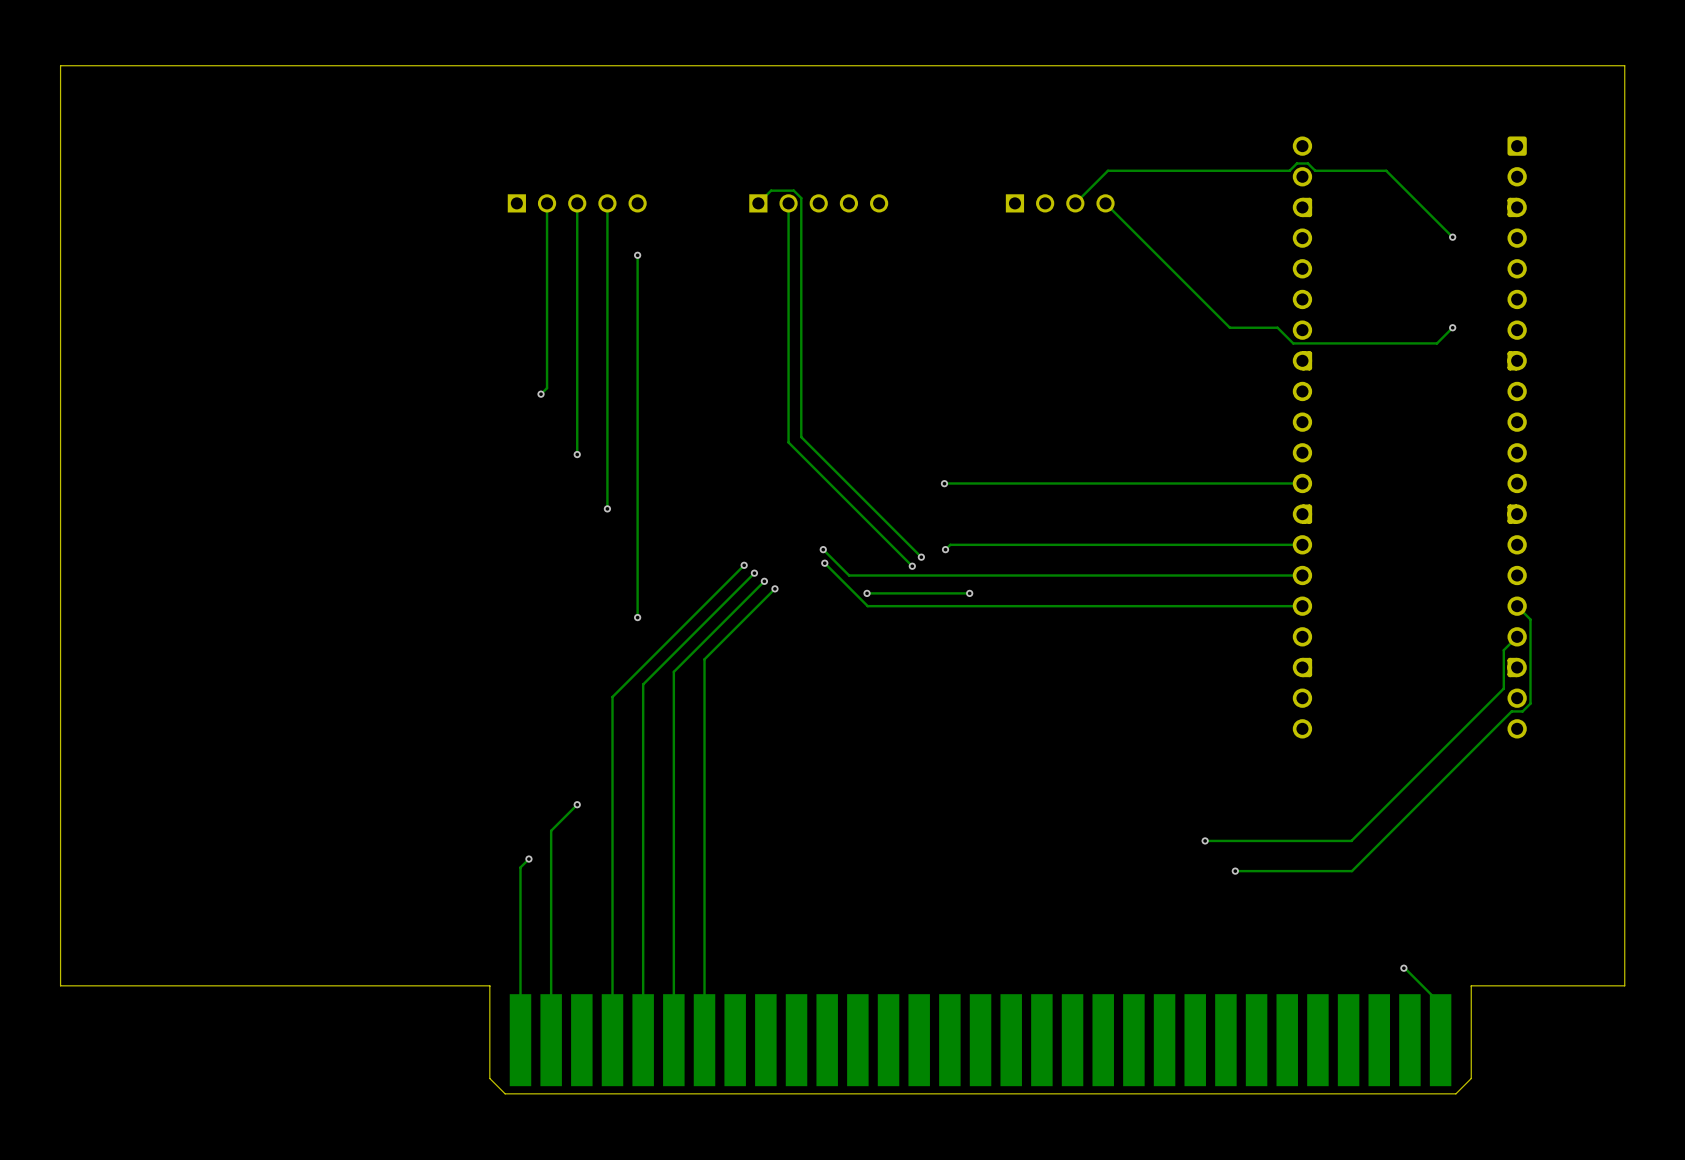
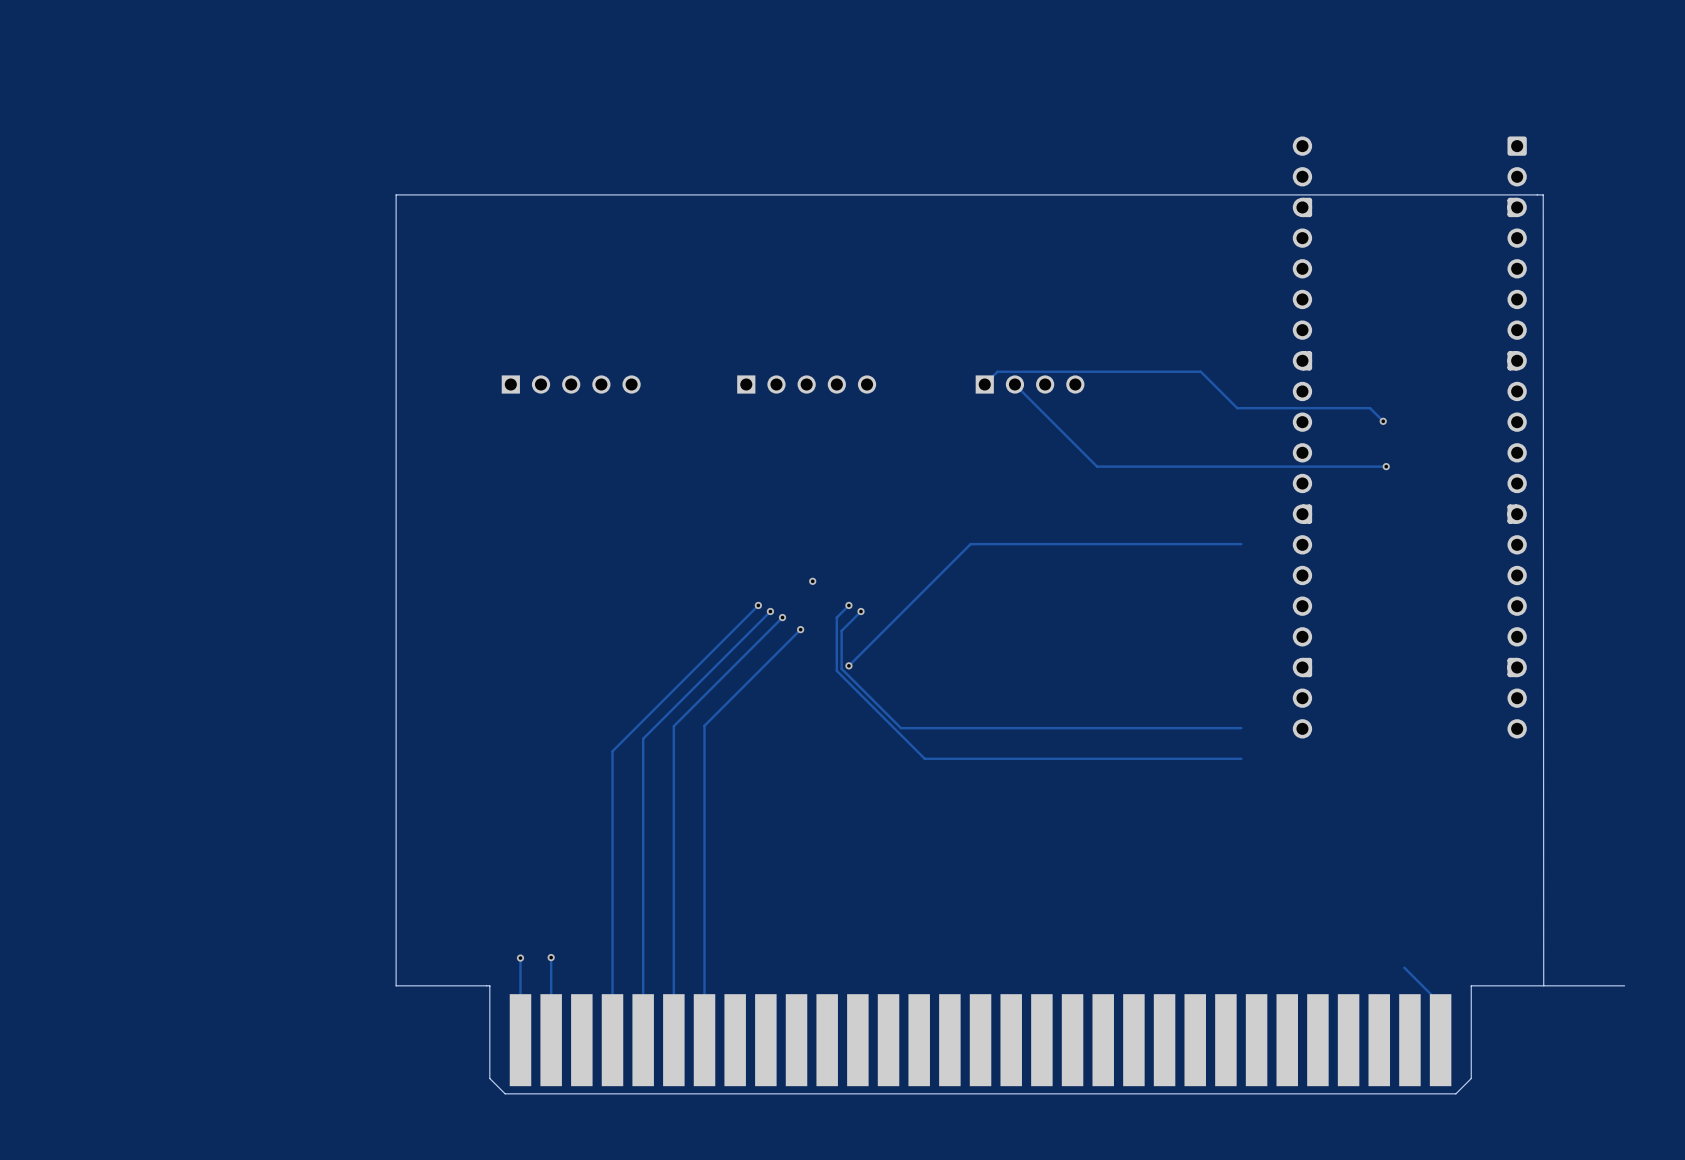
track: (547, 203) (547, 388) (541, 394) -> none
track: (577, 203) (577, 454) -> none
part: (577, 203) -> none
track: (607, 203) (607, 508) -> none
track: (758, 203) (771, 190) (793, 190) (801, 198) (801, 437) (921, 557) -> none
track: (788, 203) (788, 442) (912, 566) -> none
part: (818, 203) -> none
part position: (1060, 203) -> (1030, 384)
track: (1075, 203) (1107, 170) (1289, 170) (1296, 163) (1307, 163) (1315, 170) (1386, 170) (1452, 237) -> none
track: (1105, 203) (1229, 327) (1277, 327) (1293, 343) (1437, 343) (1452, 327) -> none
via: (1452, 237) -> none
track: (637, 255) (637, 617) -> none
via: (637, 255) -> none
via: (1452, 327) -> none
part: none -> (571, 384)
part: none -> (806, 384)
track: none -> (984, 384) (997, 371) (1200, 371) (1237, 408) (1370, 408) (1383, 421)
track: none -> (1014, 384) (1097, 466) (1386, 466)
via: (541, 394) -> none
via: none -> (1383, 421)
via: (577, 454) -> none
via: none -> (1386, 466)
via: (944, 483) -> none
track: (1302, 483) (944, 483) -> none
via: (607, 508) -> none
track: none -> (1241, 544) (970, 544) (848, 665)
track: (1302, 544) (950, 544) (945, 549) -> none
track: (823, 549) (849, 575) (1302, 575) -> none
via: (823, 549) -> none
via: (945, 549) -> none
via: (921, 557) -> none
track: (824, 563) (867, 606) (1302, 606) -> none
via: (824, 563) -> none
track: (744, 565) (612, 697) (612, 751) -> none
via: (744, 565) -> none
via: (912, 566) -> none
track: (754, 573) (643, 684) (643, 738) -> (770, 611) (643, 738)
via: (754, 573) -> none
track: (764, 581) (673, 671) (673, 726) -> (782, 617) (673, 726)
via: (764, 581) -> none
via: none -> (812, 581)
track: (774, 588) (758, 605) -> none
via: (774, 588) -> none
via: (867, 593) -> none
track: (969, 593) (867, 593) -> none
via: (969, 593) -> none
via: none -> (758, 605)
track: none -> (848, 605) (836, 617) (836, 670) (924, 758) (1241, 758)
via: none -> (848, 605)
track: (1517, 606) (1530, 619) (1530, 703) (1522, 711) (1511, 711) (1351, 871) (1235, 871) -> none
via: none -> (770, 611)
track: none -> (861, 611) (841, 630) (841, 668) (900, 728) (1241, 728)
via: none -> (861, 611)
via: (637, 617) -> none
via: none -> (782, 617)
track: none -> (800, 629) (704, 725)
via: none -> (800, 629)
track: (1517, 636) (1503, 650) (1503, 688) (1351, 840) (1205, 840) -> none
track: (704, 659) (704, 725) -> (704, 659) (612, 751)
via: none -> (848, 665)
track: (577, 804) (551, 830) (551, 957) -> none
via: (577, 804) -> none
via: (1205, 840) -> none
track: (528, 859) (520, 867) (520, 958) -> none
via: (528, 859) -> none
via: (1235, 871) -> none
via: none -> (551, 957)
via: none -> (520, 958)
via: (1403, 968) -> none
board edge: (1624, 985) (1624, 65) (60, 65) (60, 985) (396, 985) -> (1543, 985) (1543, 194) (396, 194) (396, 985)

